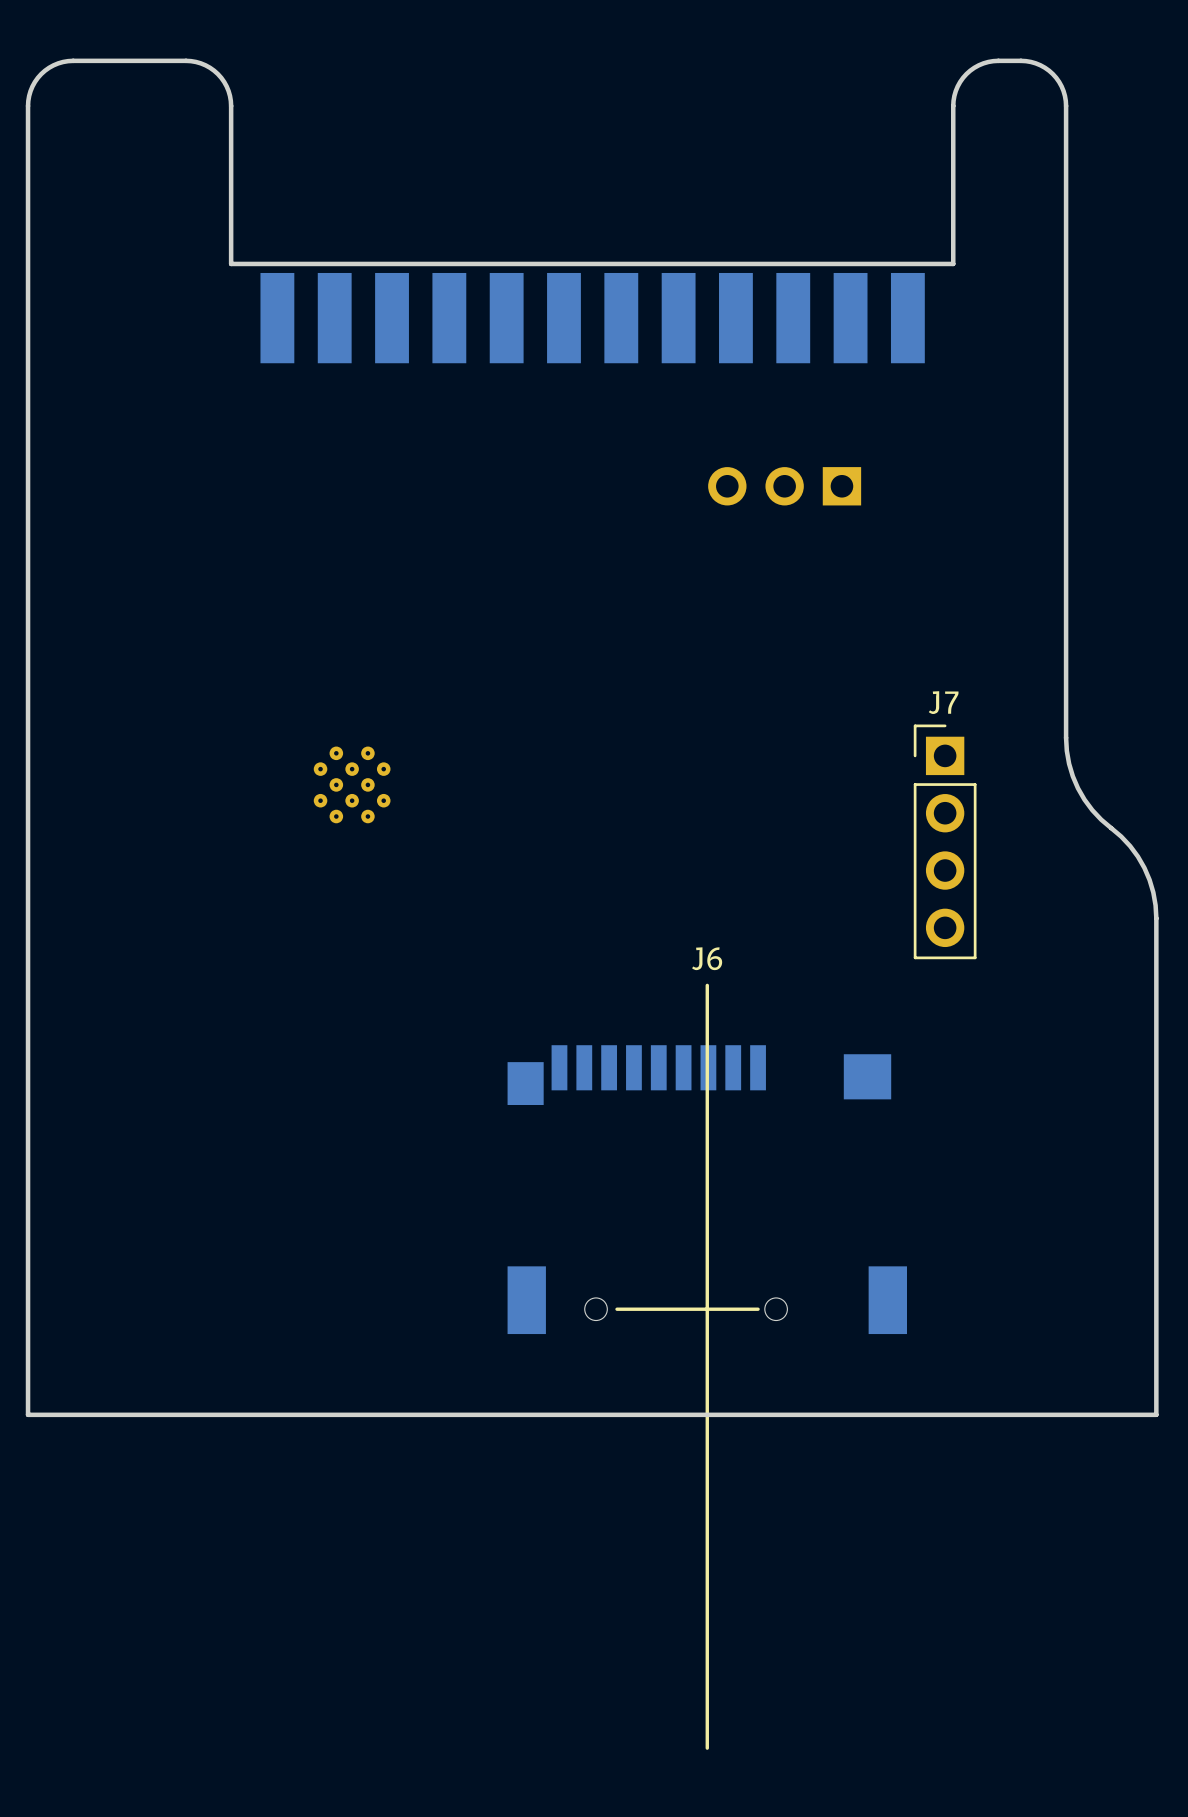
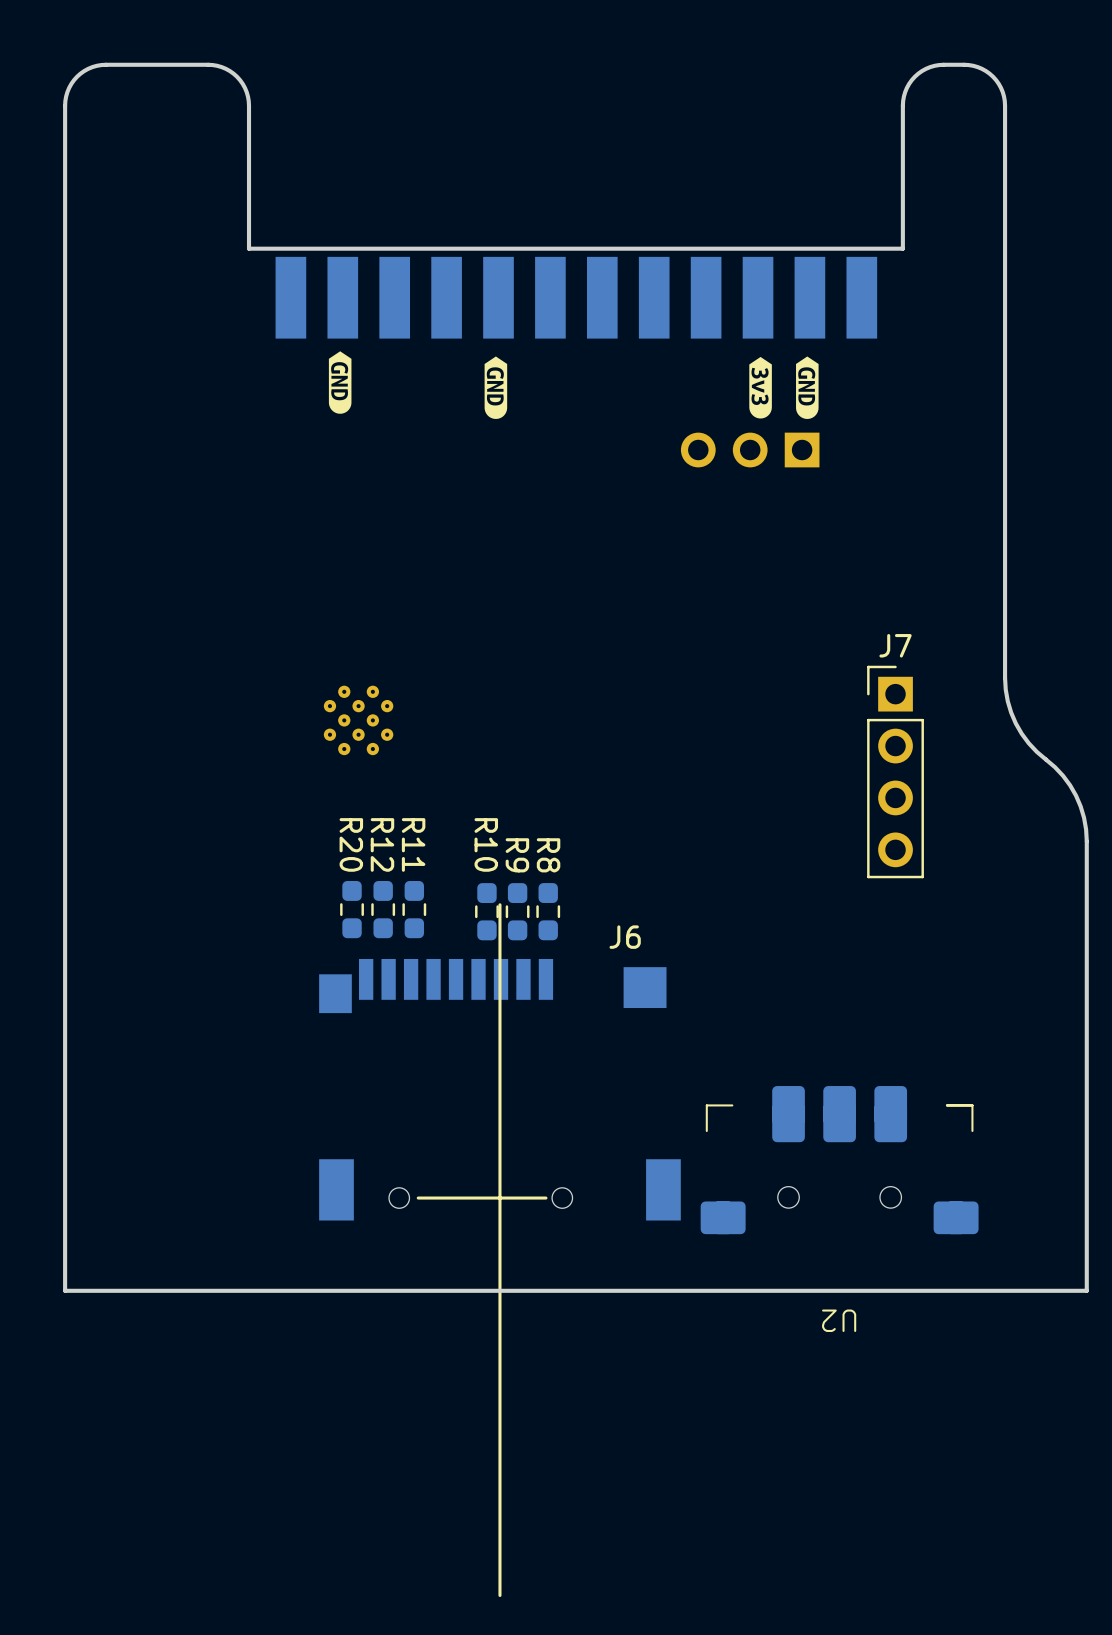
drawing: none -> [328, 351, 352, 414]
drawing: none -> [484, 356, 508, 419]
drawing: none -> [749, 356, 819, 419]
J6 name position: J6 (707, 958) -> J6 (625, 937)
R20: none -> (352, 909)
R12: none -> (383, 909)
R11: none -> (414, 909)
R10: none -> (486, 911)
R9: none -> (517, 911)
R8: none -> (548, 911)
U2: none -> (839, 1160)
J6 position: (707, 1366) -> (499, 1250)

